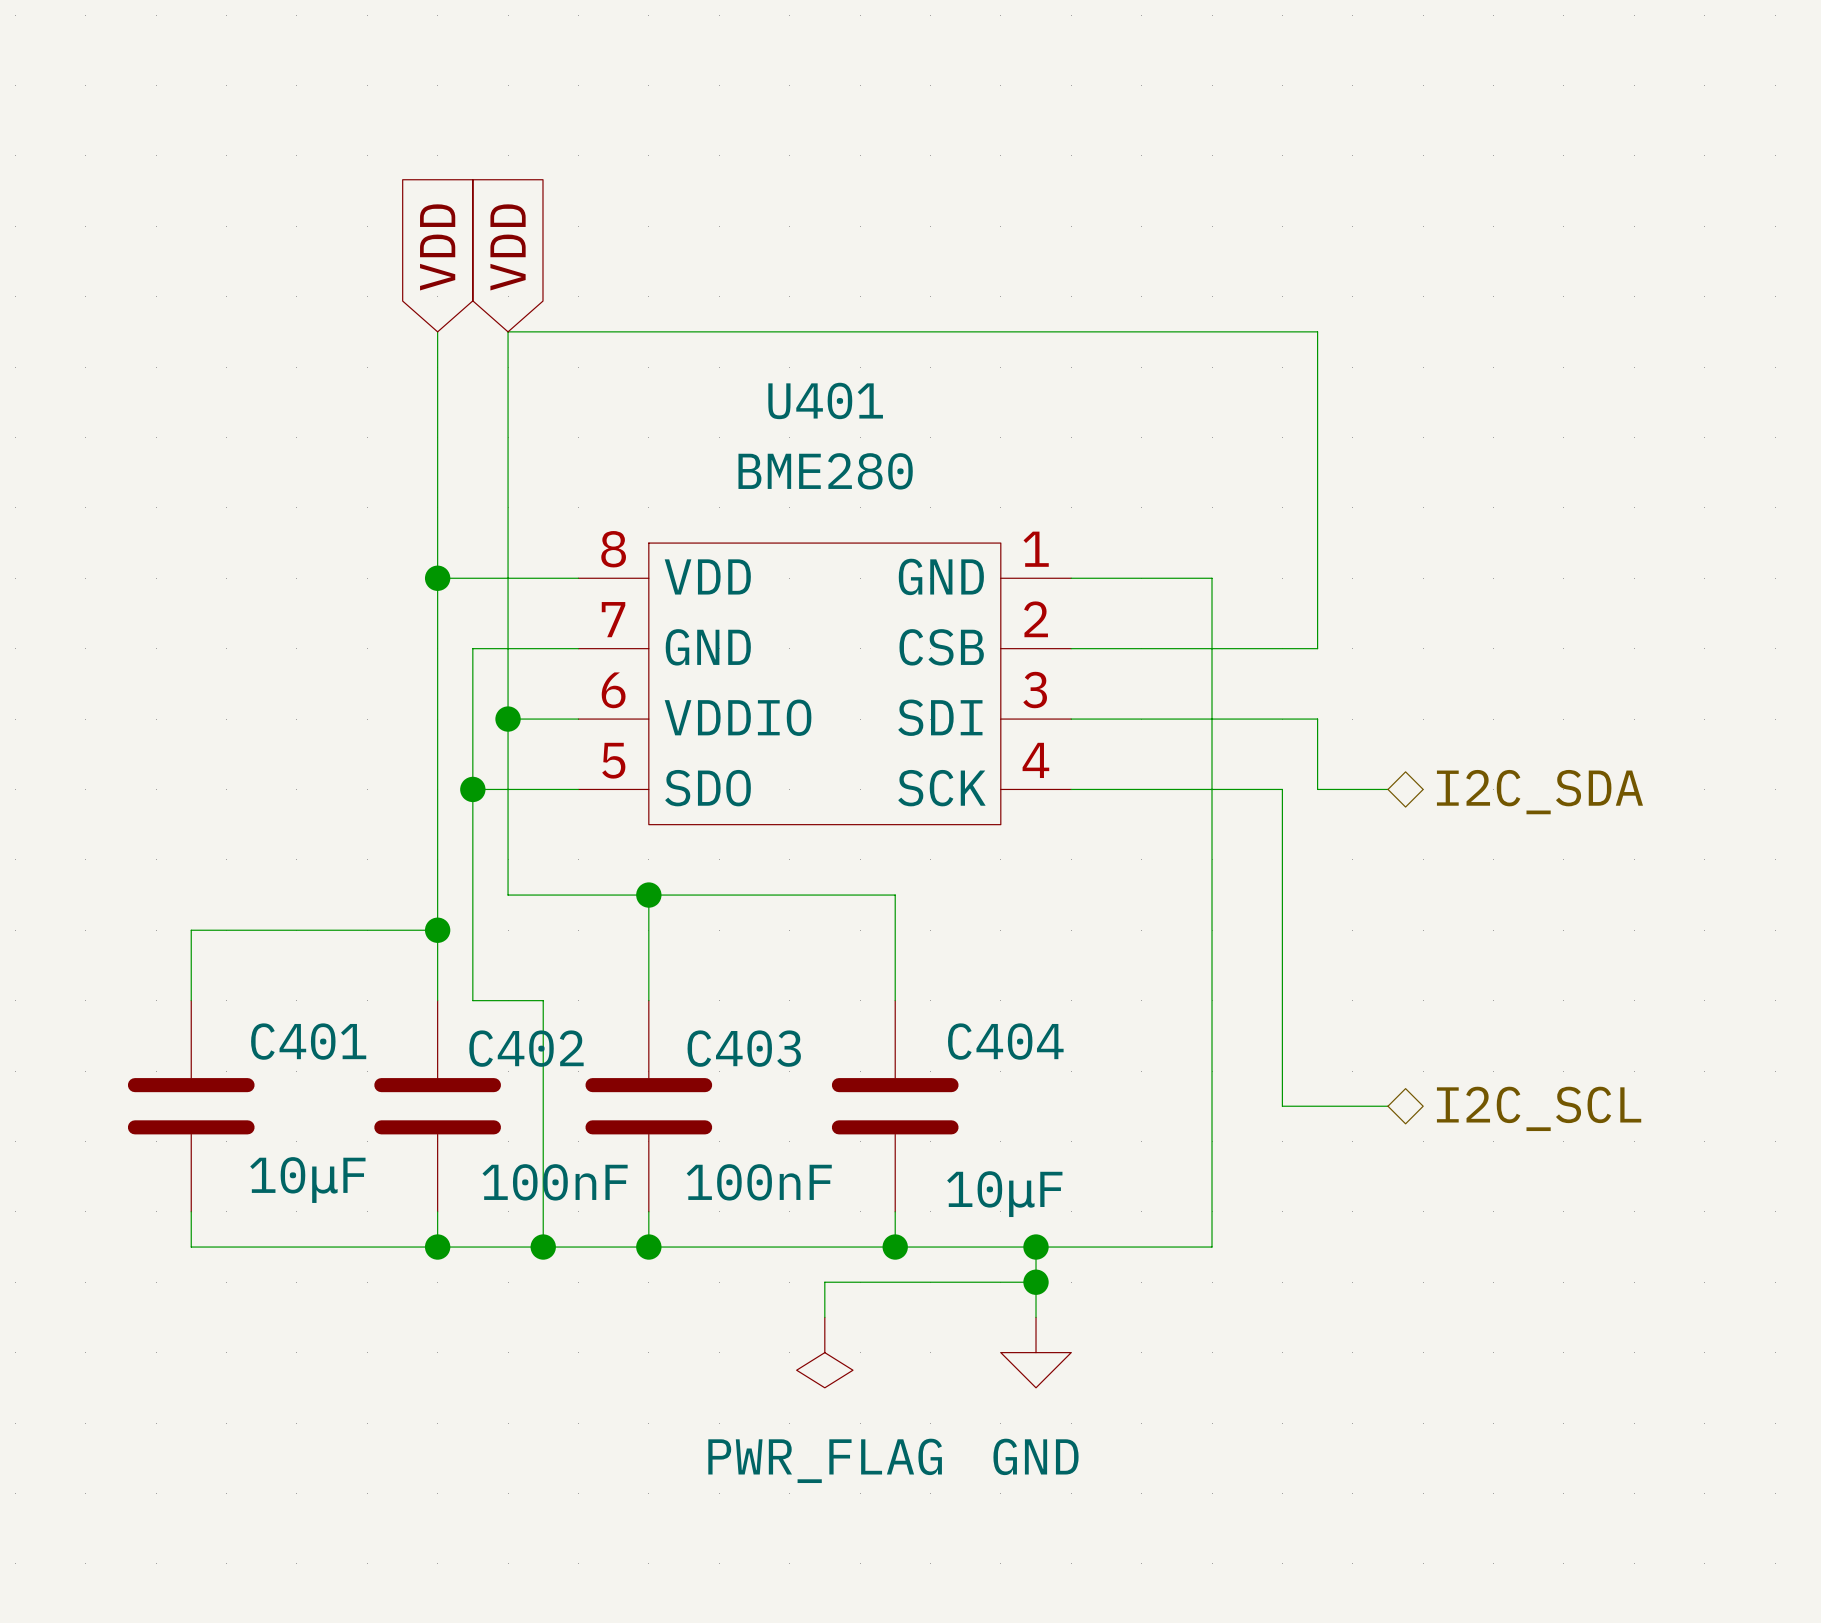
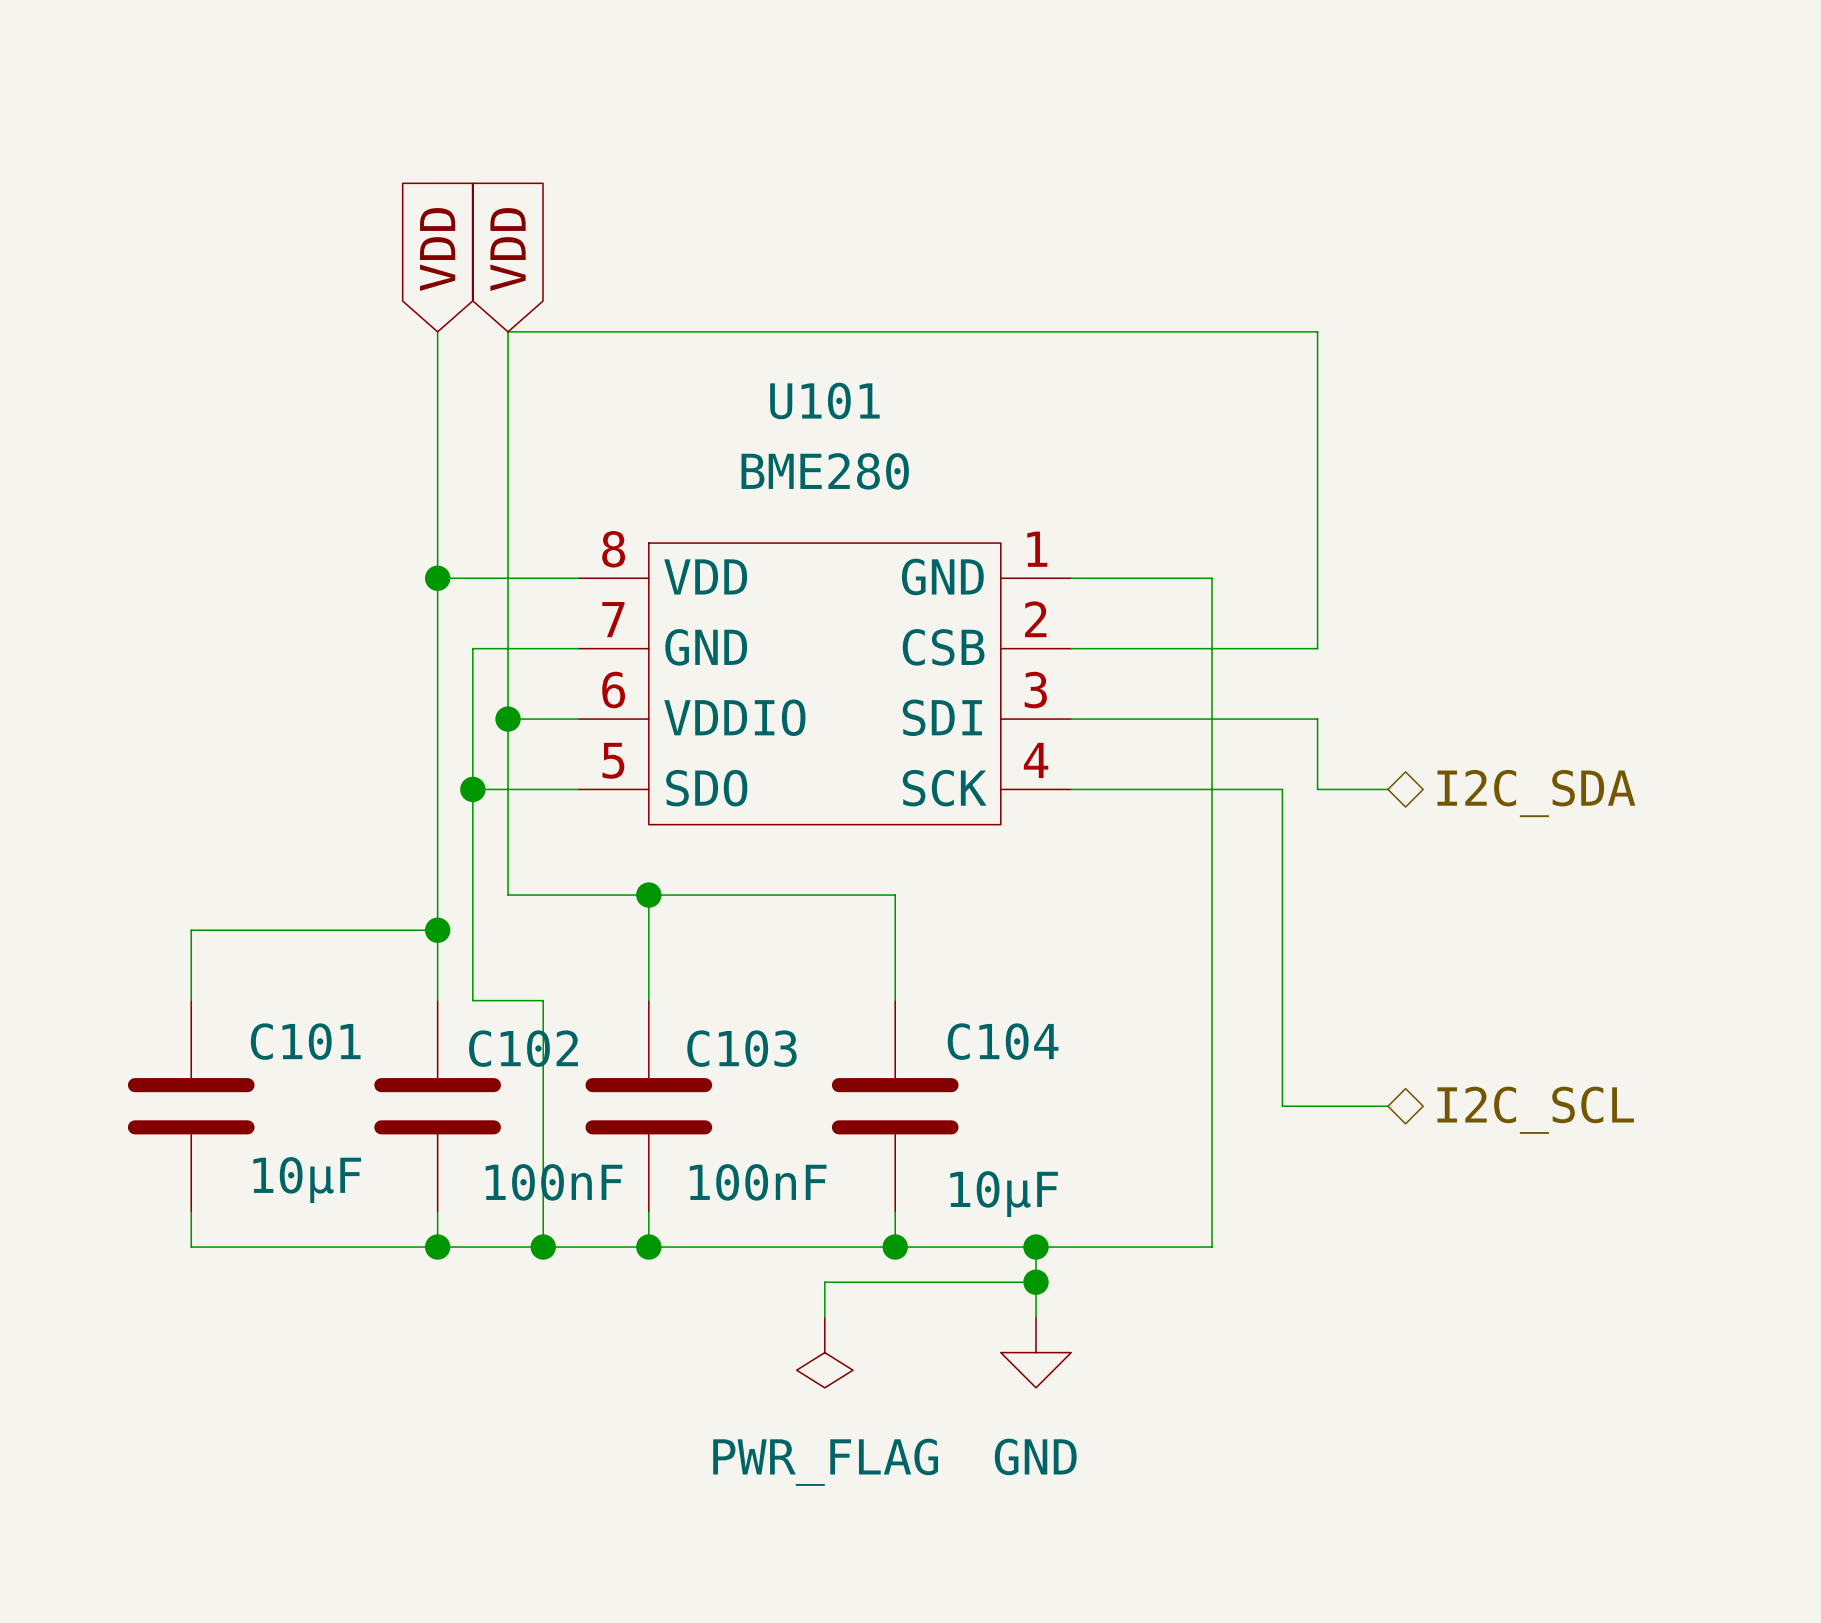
U401 name: U401 (825, 400) -> U101 (824, 400)
C401 name: C401 (308, 1041) -> C101 (305, 1041)
C404 name: C404 (1005, 1041) -> C104 (1003, 1041)
C402 name: C402 (526, 1048) -> C102 (523, 1048)
C403 name: C403 (744, 1048) -> C103 (741, 1048)

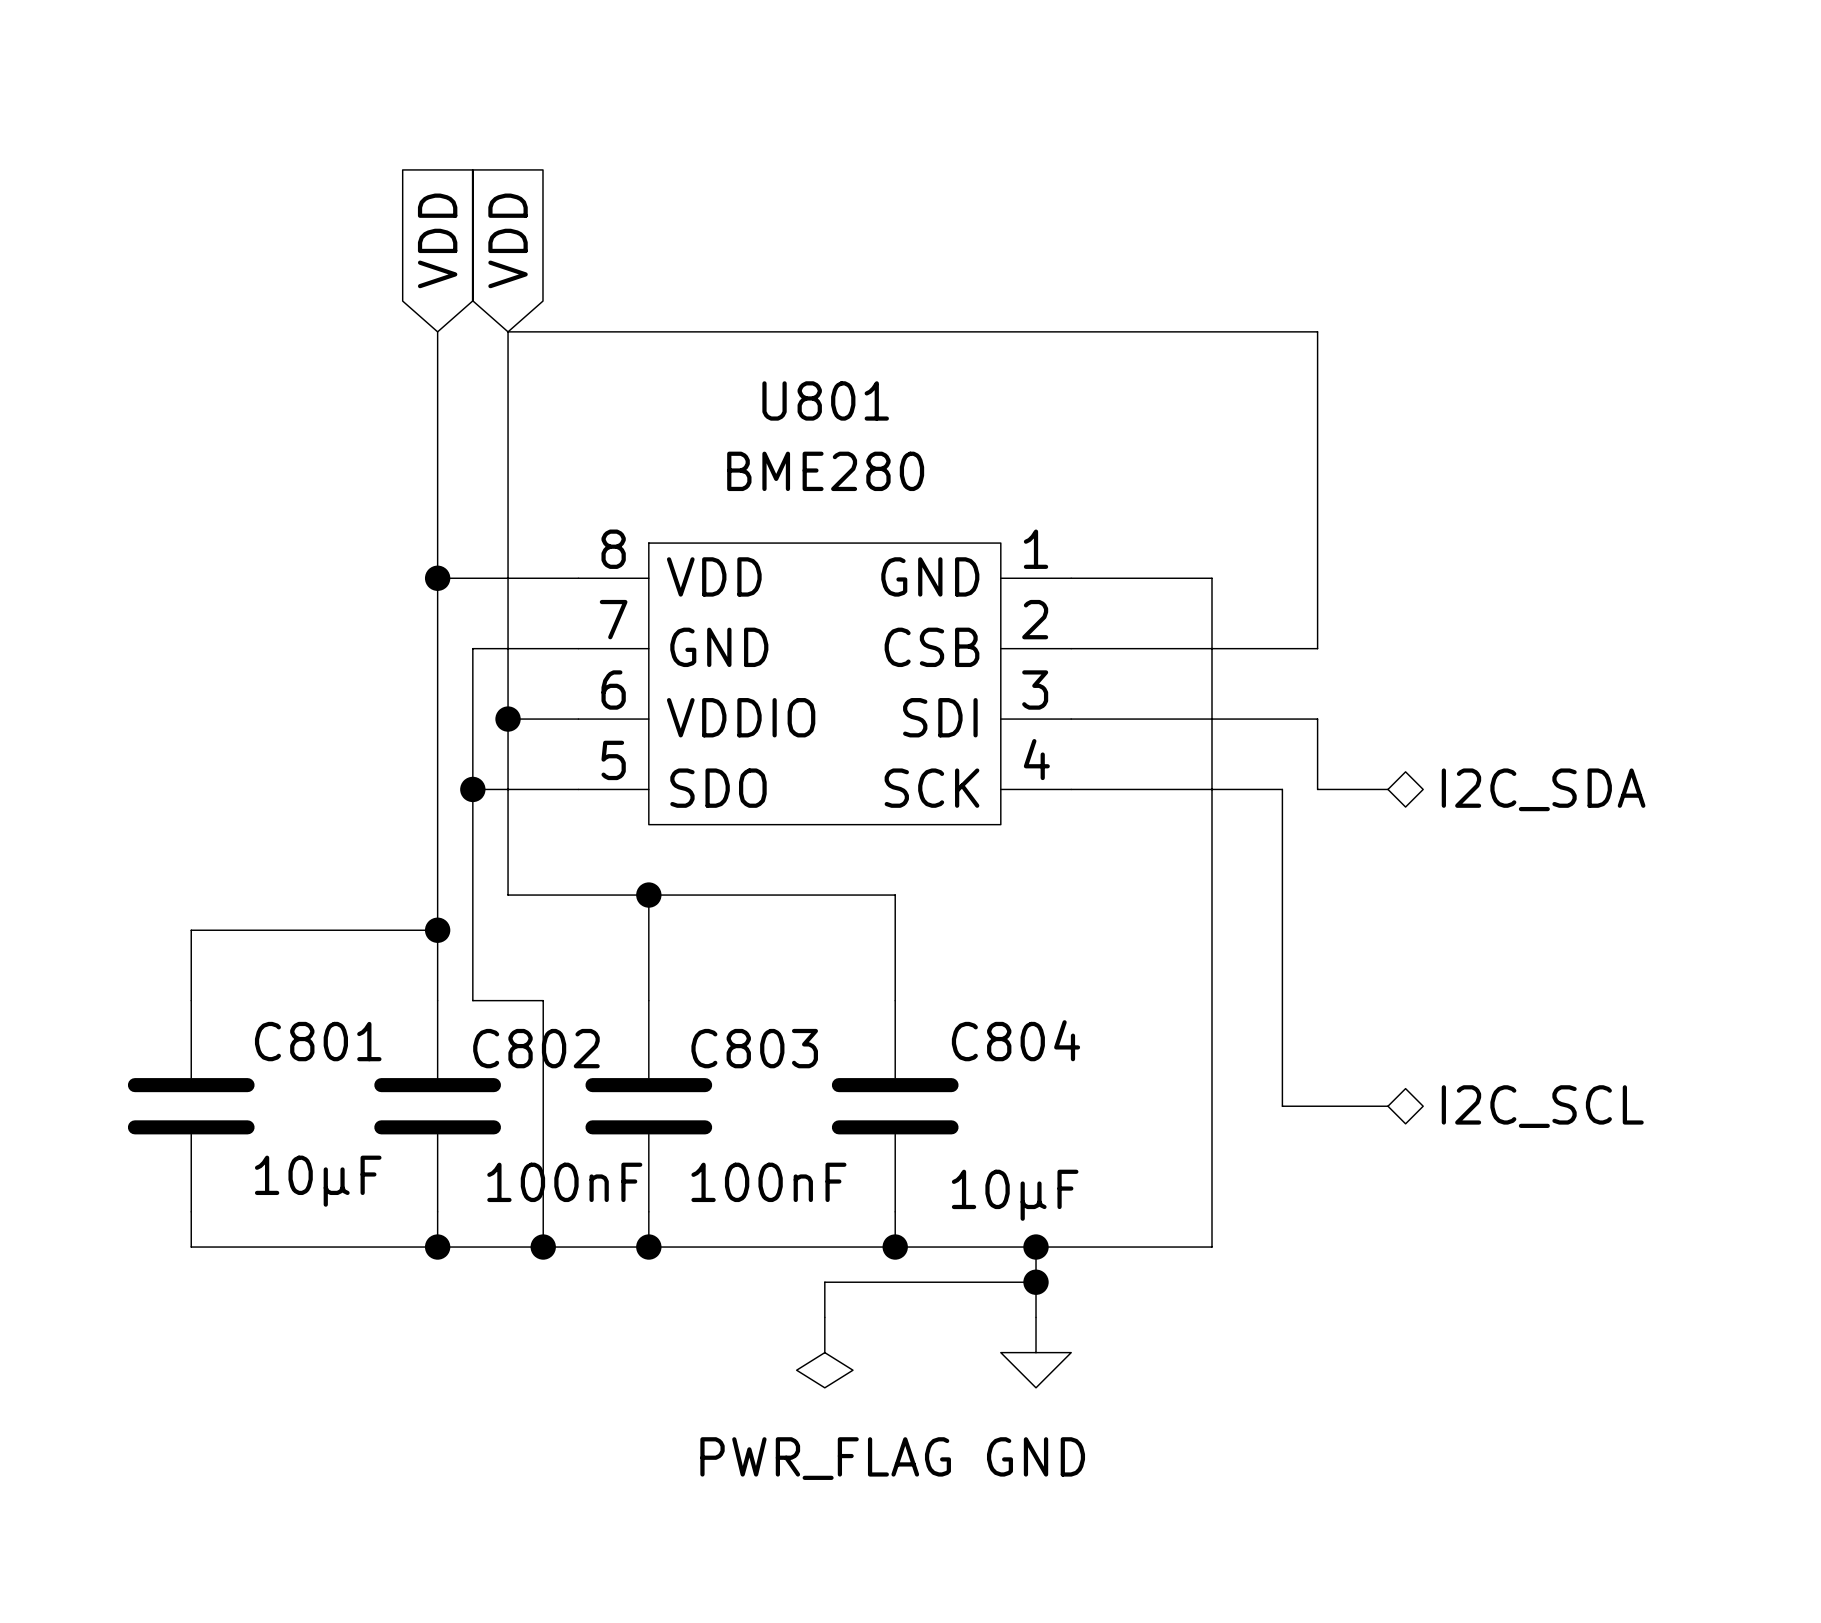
U101 name: U101 (824, 400) -> U801 (825, 400)
C101 name: C101 (305, 1041) -> C801 (318, 1041)
C104 name: C104 (1003, 1041) -> C804 (1015, 1040)
C102 name: C102 (523, 1048) -> C802 (536, 1048)
C103 name: C103 (741, 1048) -> C803 (754, 1048)

